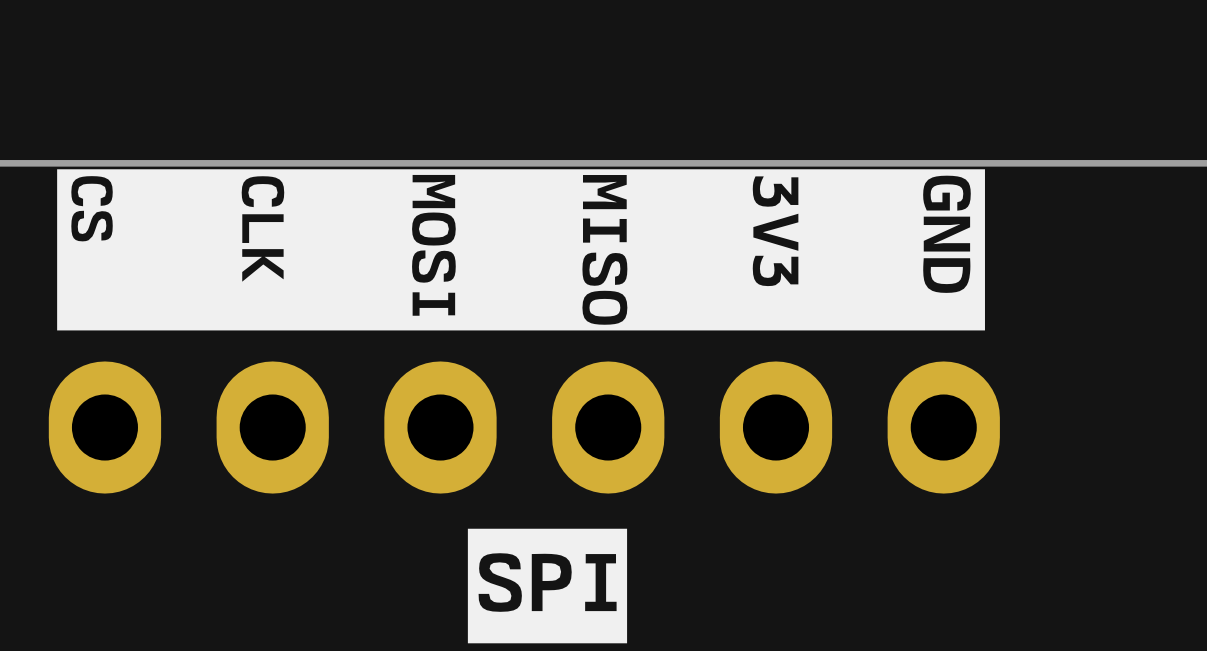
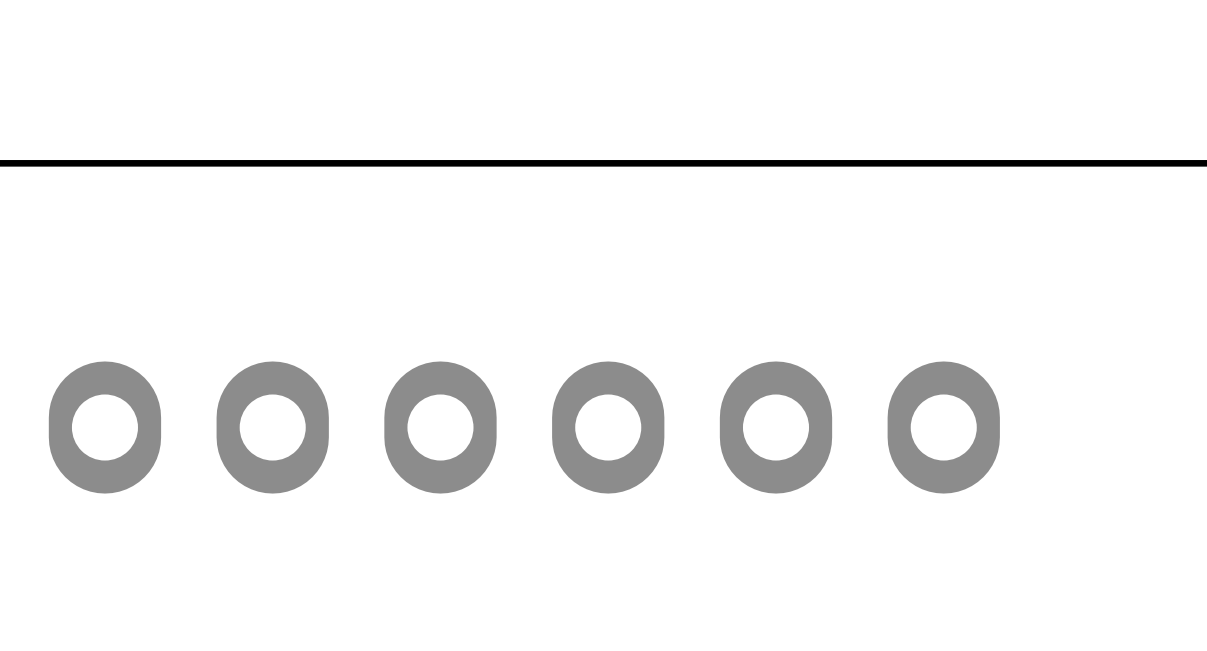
drawing: [57, 169, 985, 331] -> none
drawing: [467, 528, 628, 644] -> none

